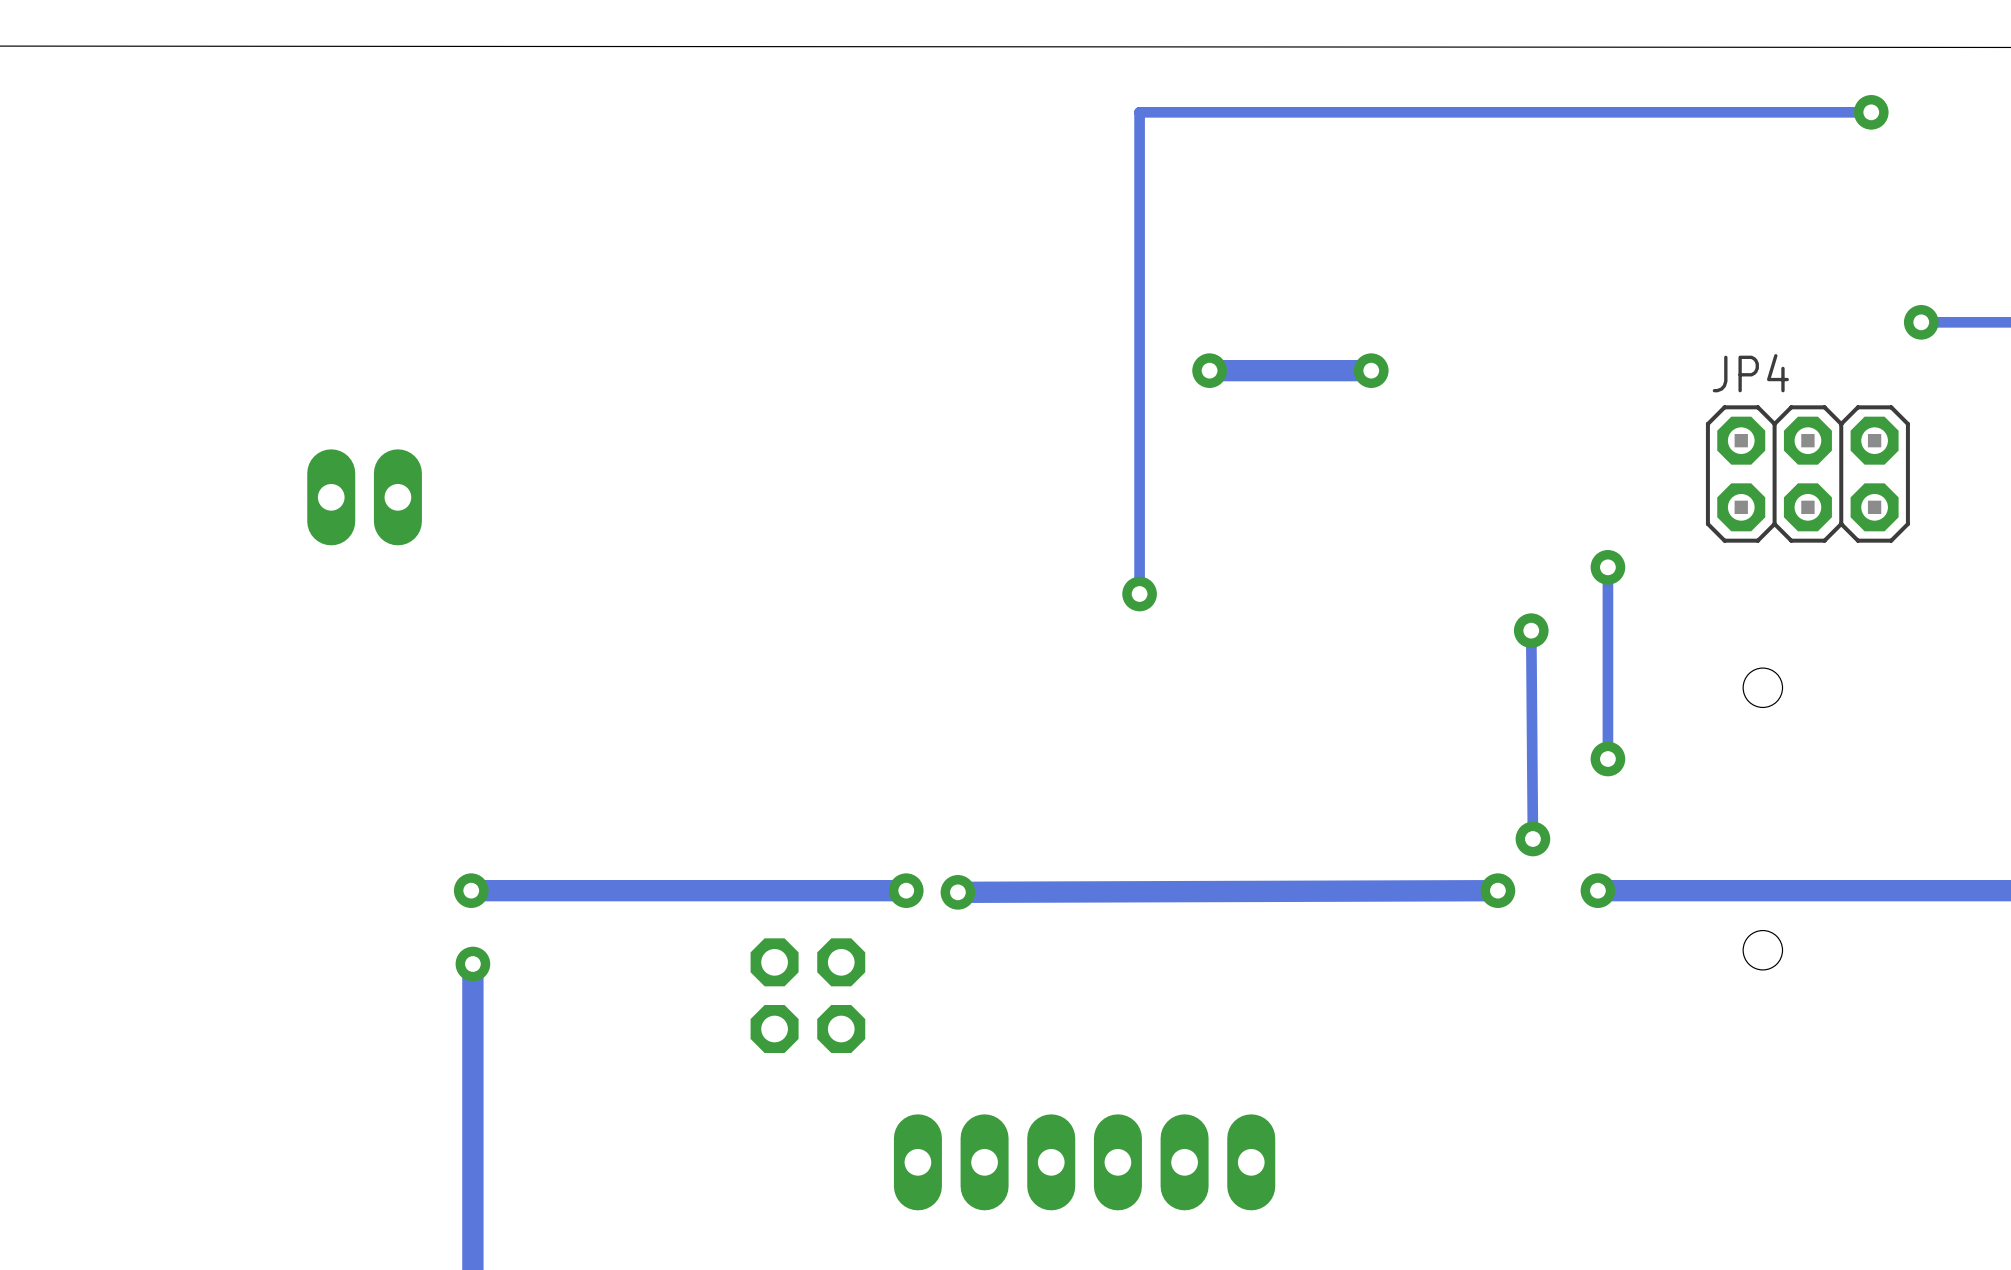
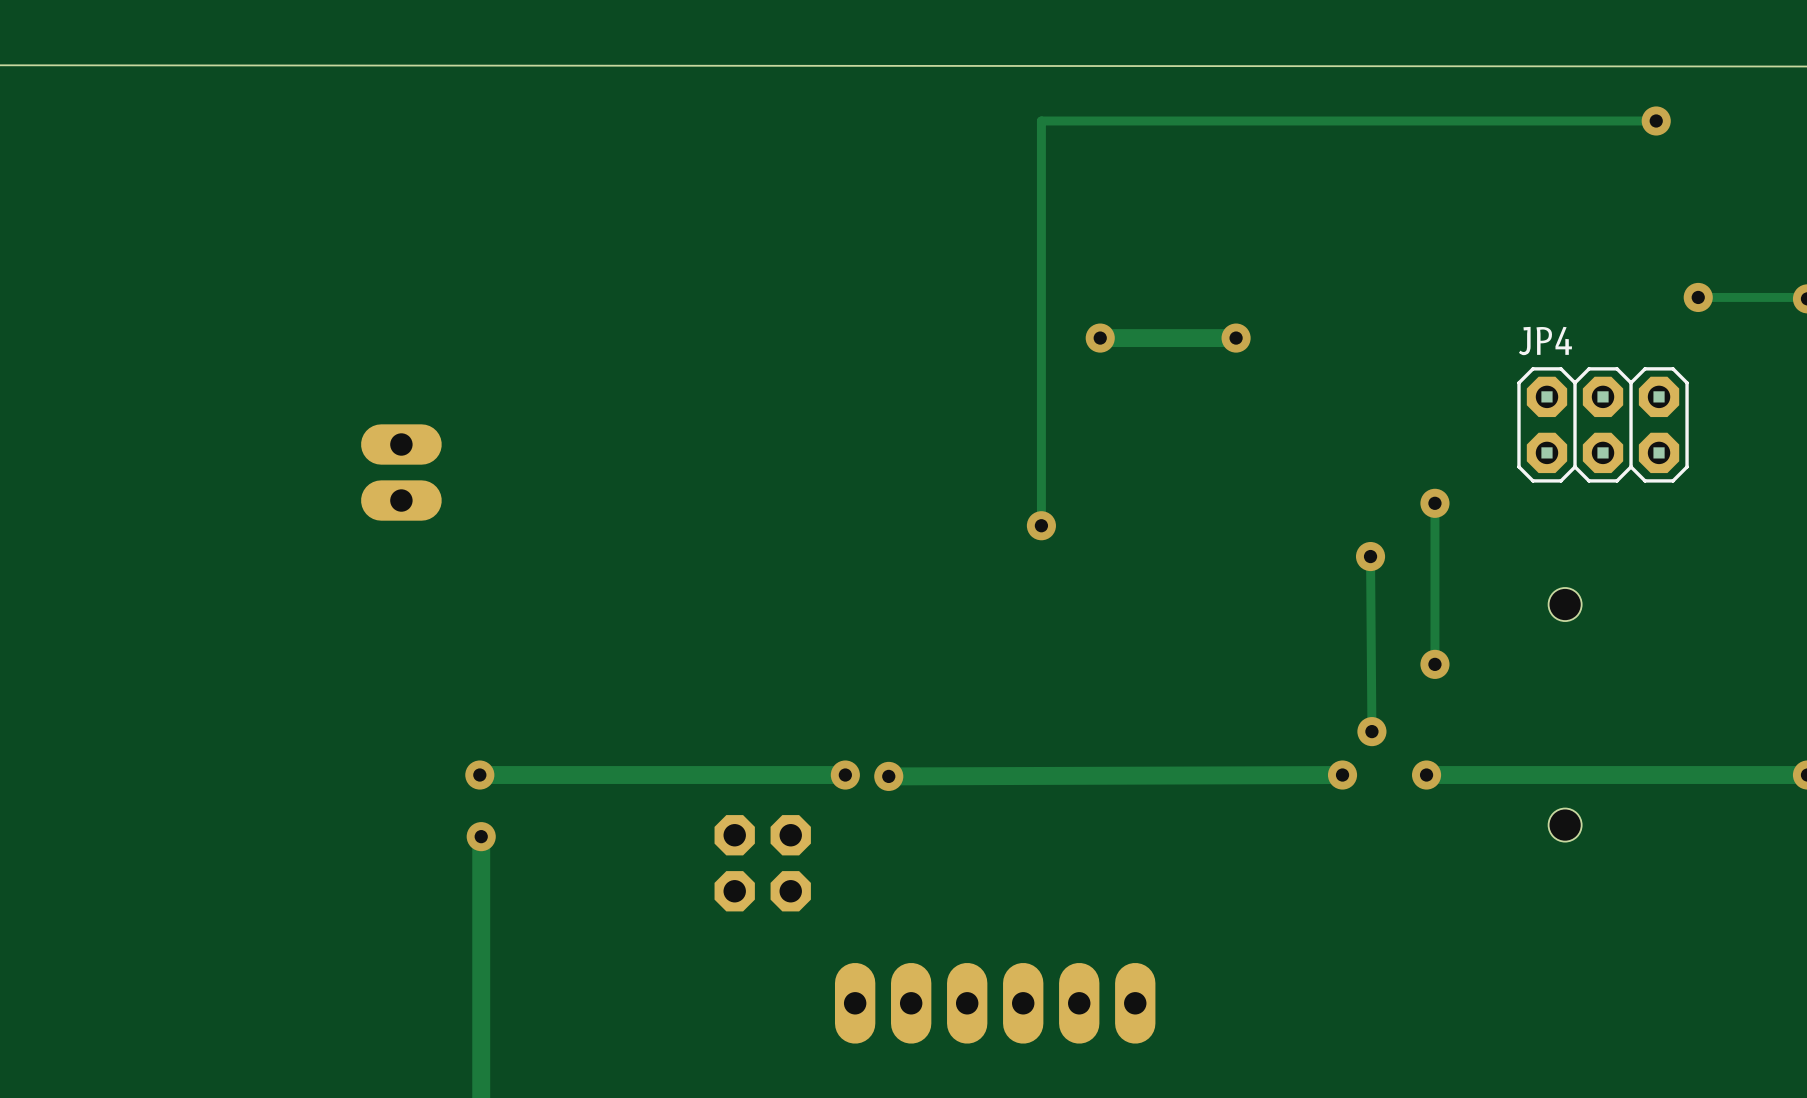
part rotation: 0° (364, 497) -> 90° clockwise (401, 472)

